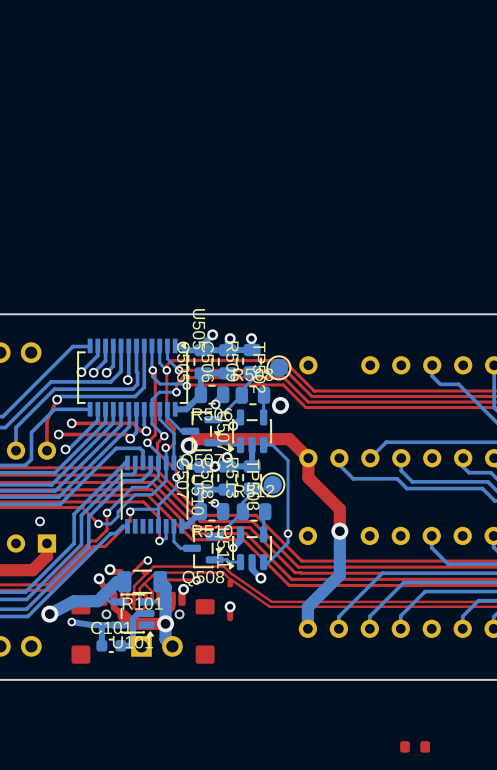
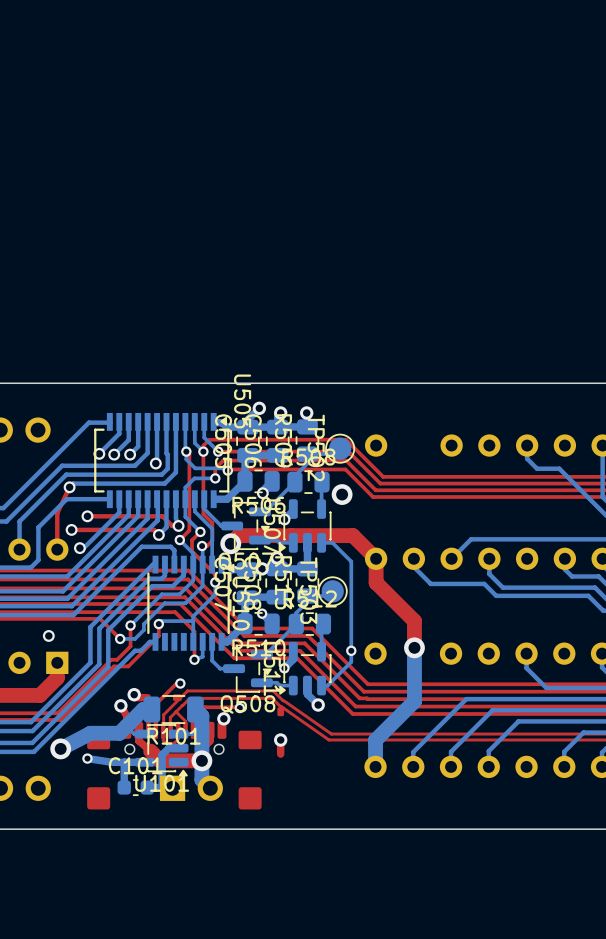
part: (415, 746) -> none

